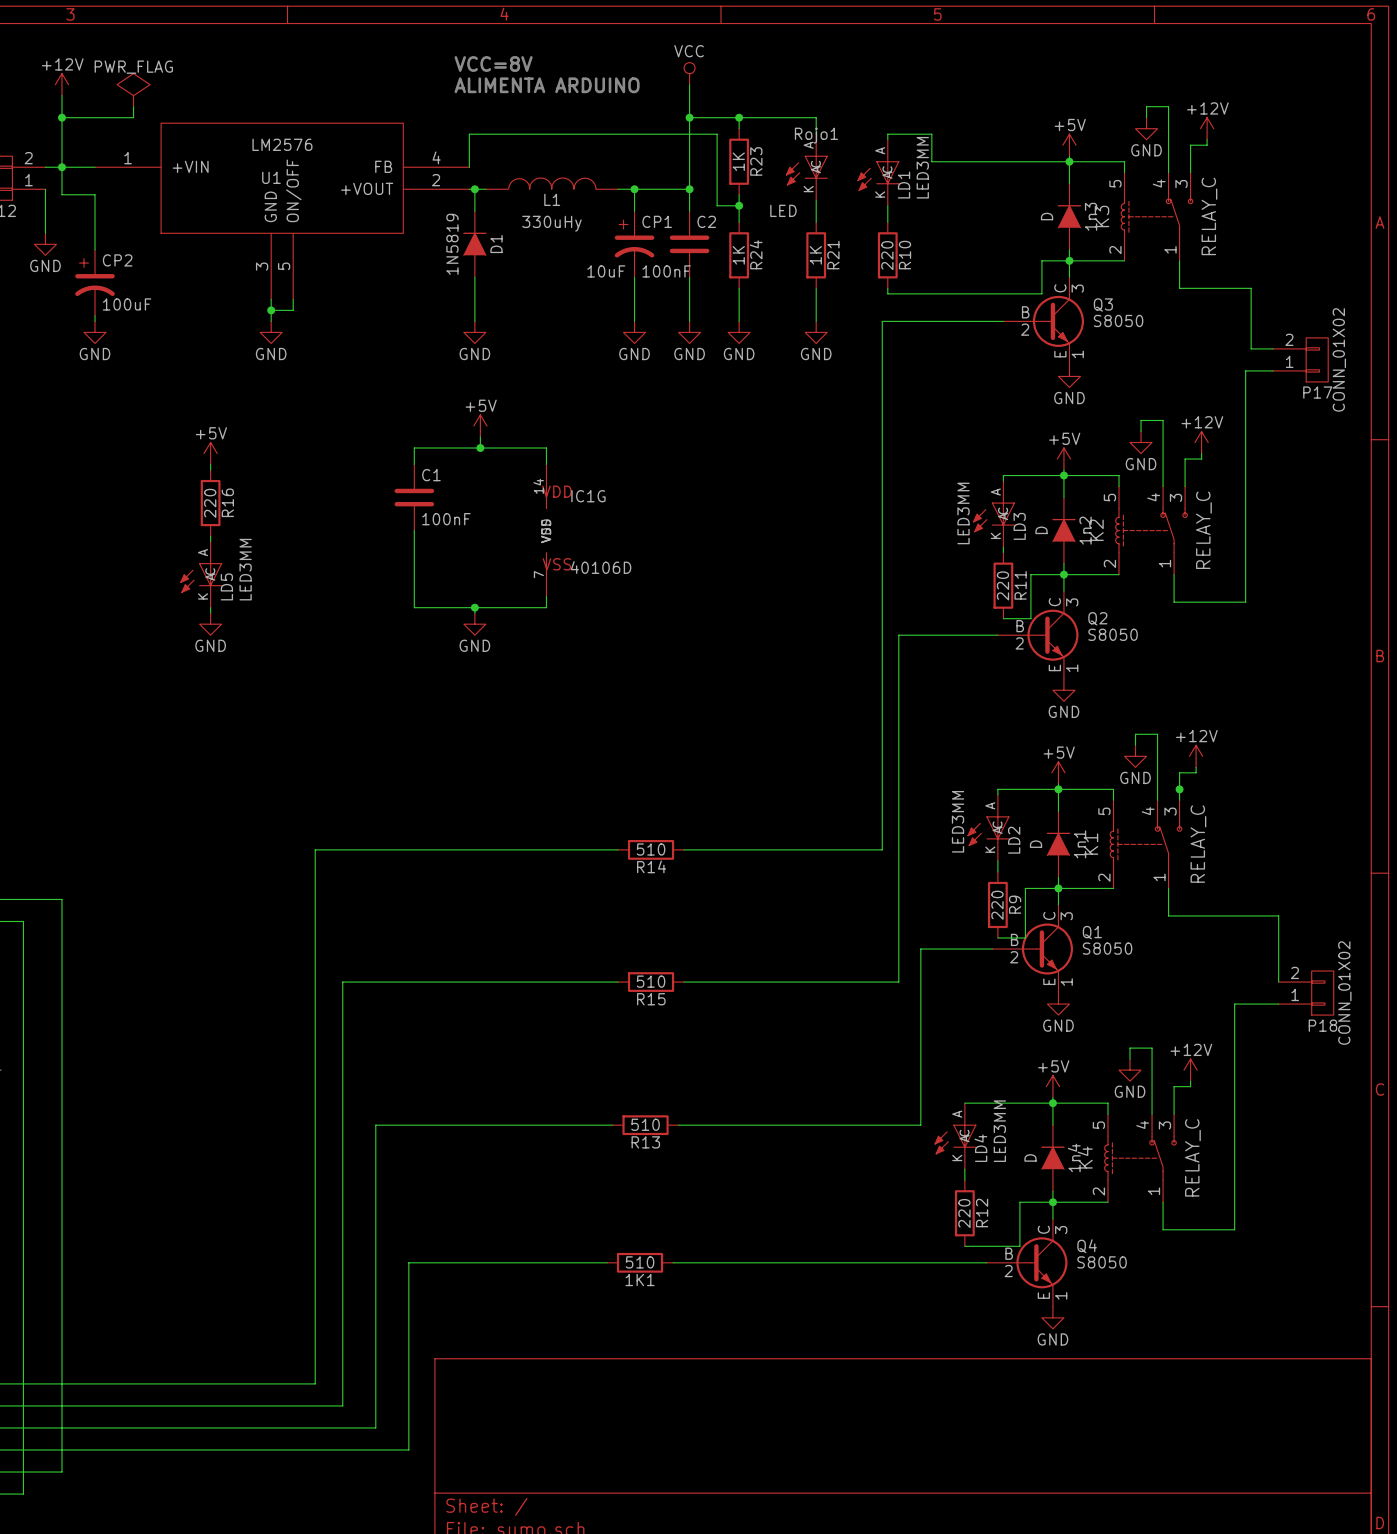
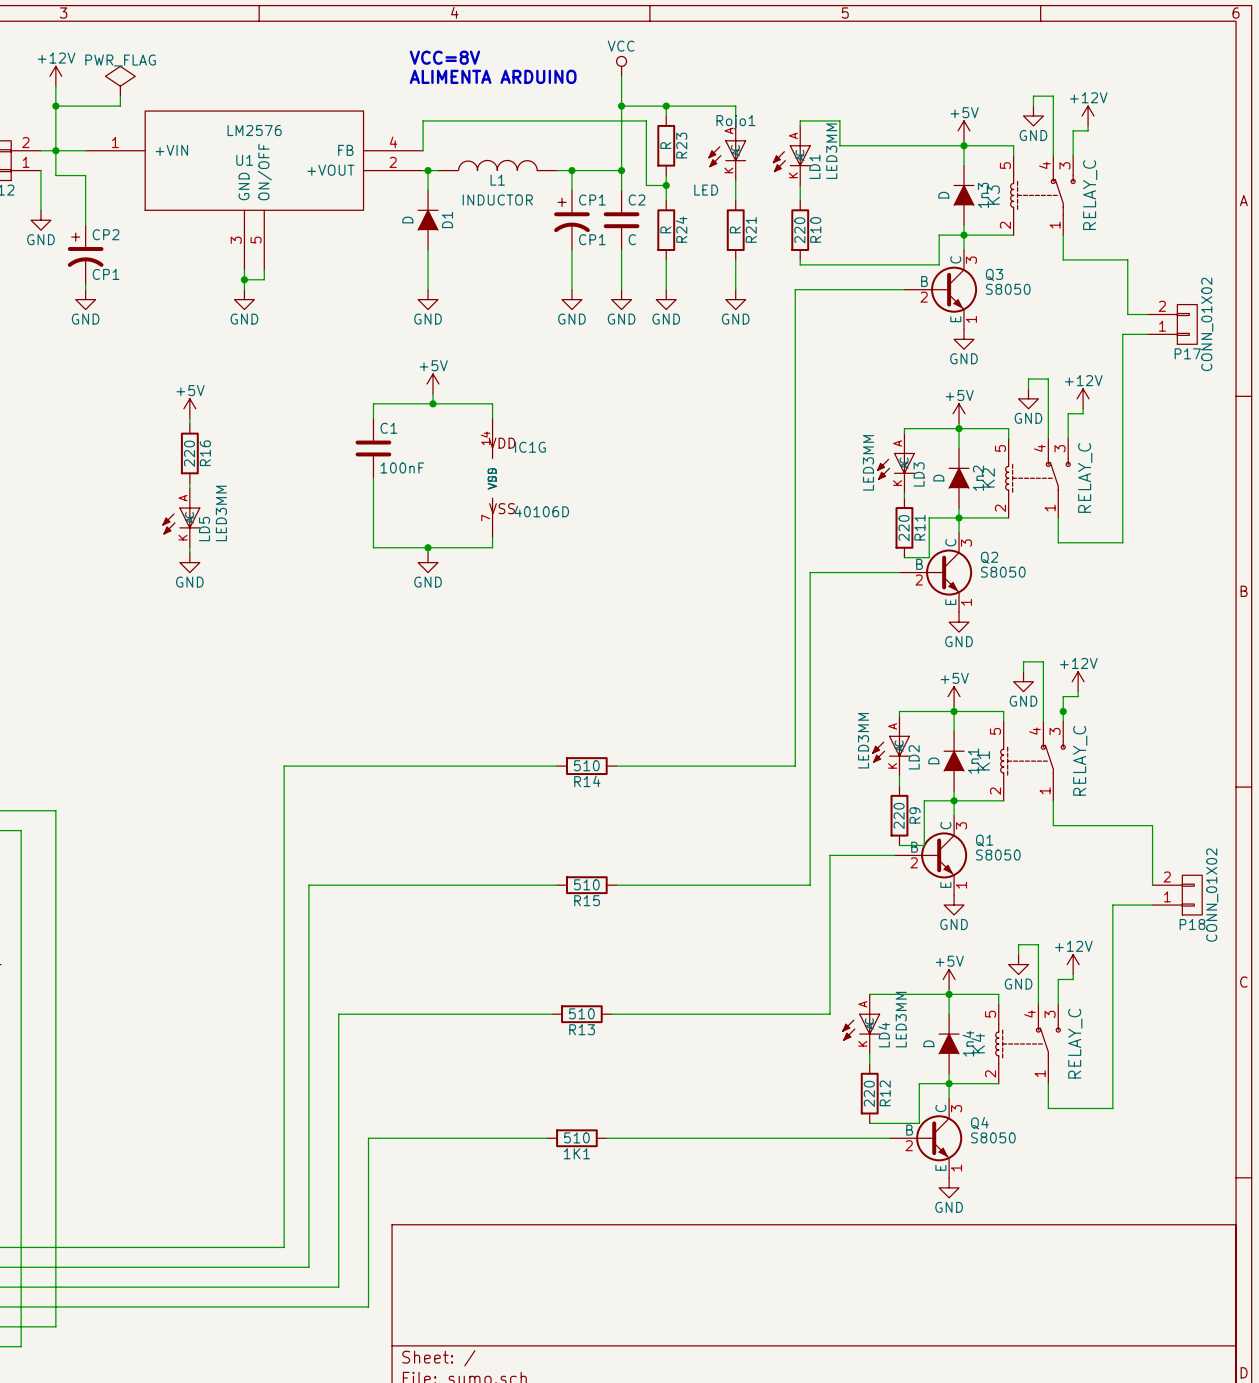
R23 value: 1K (738, 161) -> R (665, 145)
L1 value: 330uHy (551, 223) -> INDUCTOR (497, 200)
D1 value: 1N5819 (452, 244) -> D (407, 219)
R24 value: 1K (738, 255) -> R (665, 229)
R21 value: 1K (815, 255) -> R (735, 229)
CP1 value: 10uF (606, 271) -> CP1 (592, 239)
C2 value: 100nF (666, 271) -> C (632, 239)
CP2 value: 100uF (127, 304) -> CP1 (106, 274)

